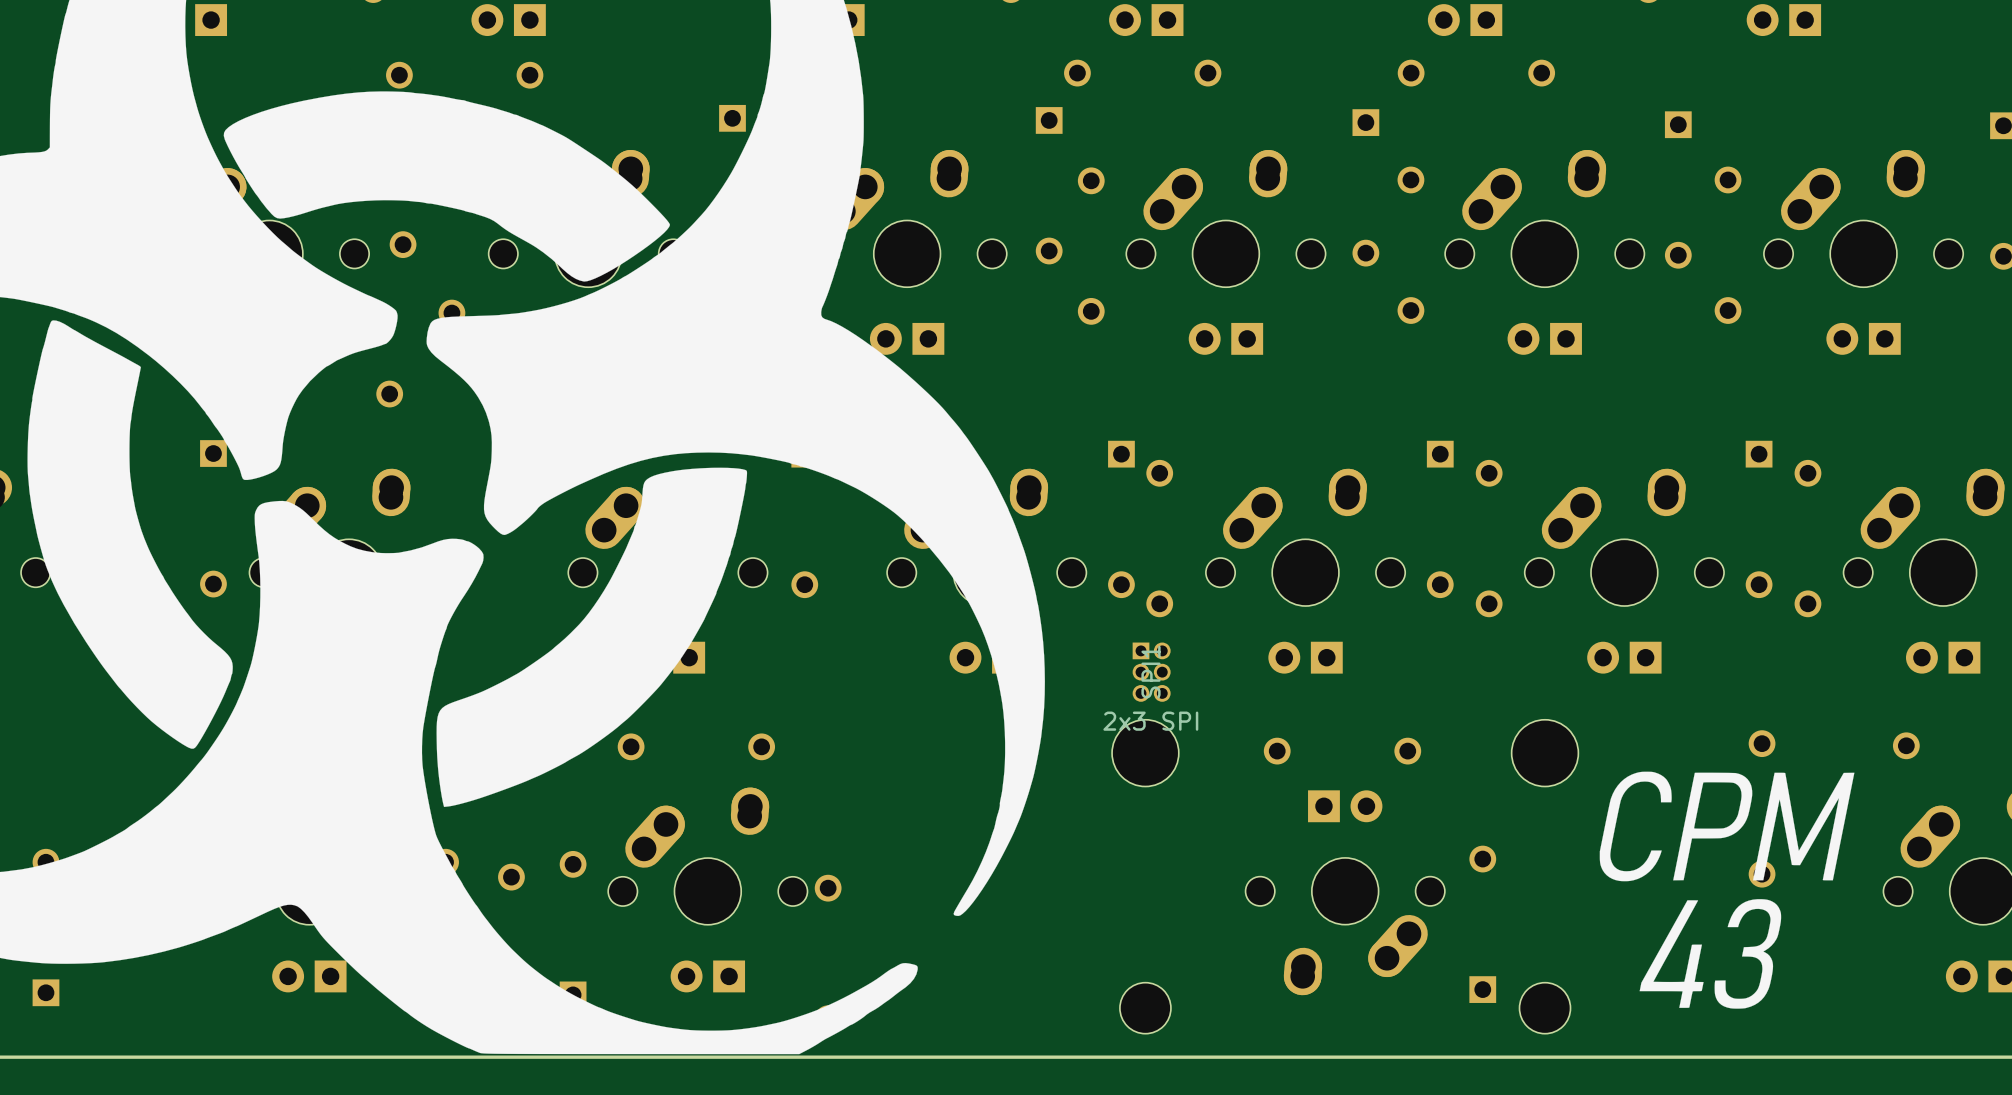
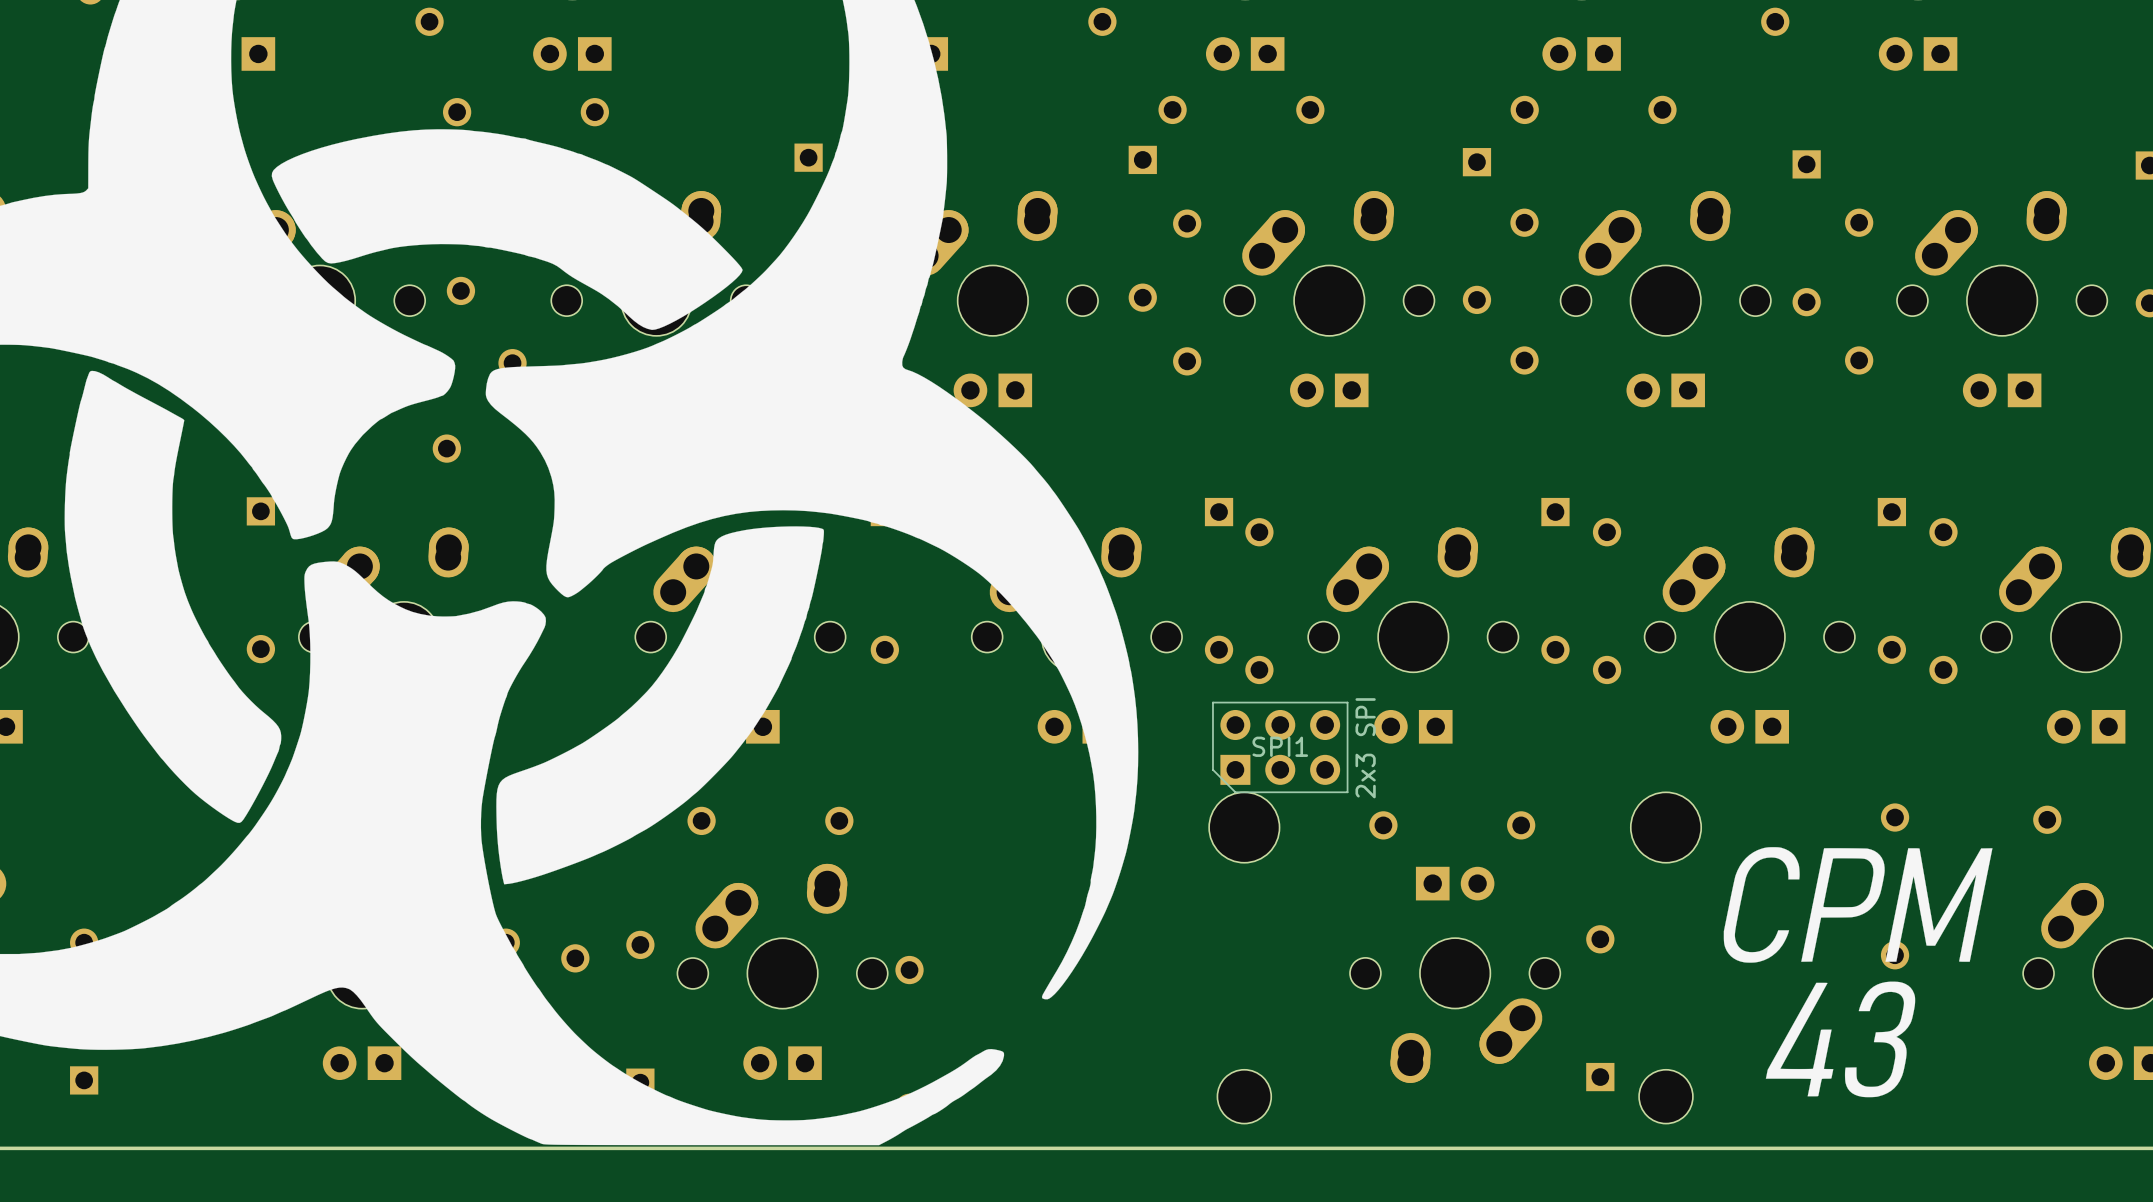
SPI1 footprint: [1132, 642, 1171, 702] -> [1212, 701, 1349, 794]
SPI1 value position: 2x3 SPI (1150, 721) -> 2x3 SPI (1365, 748)

